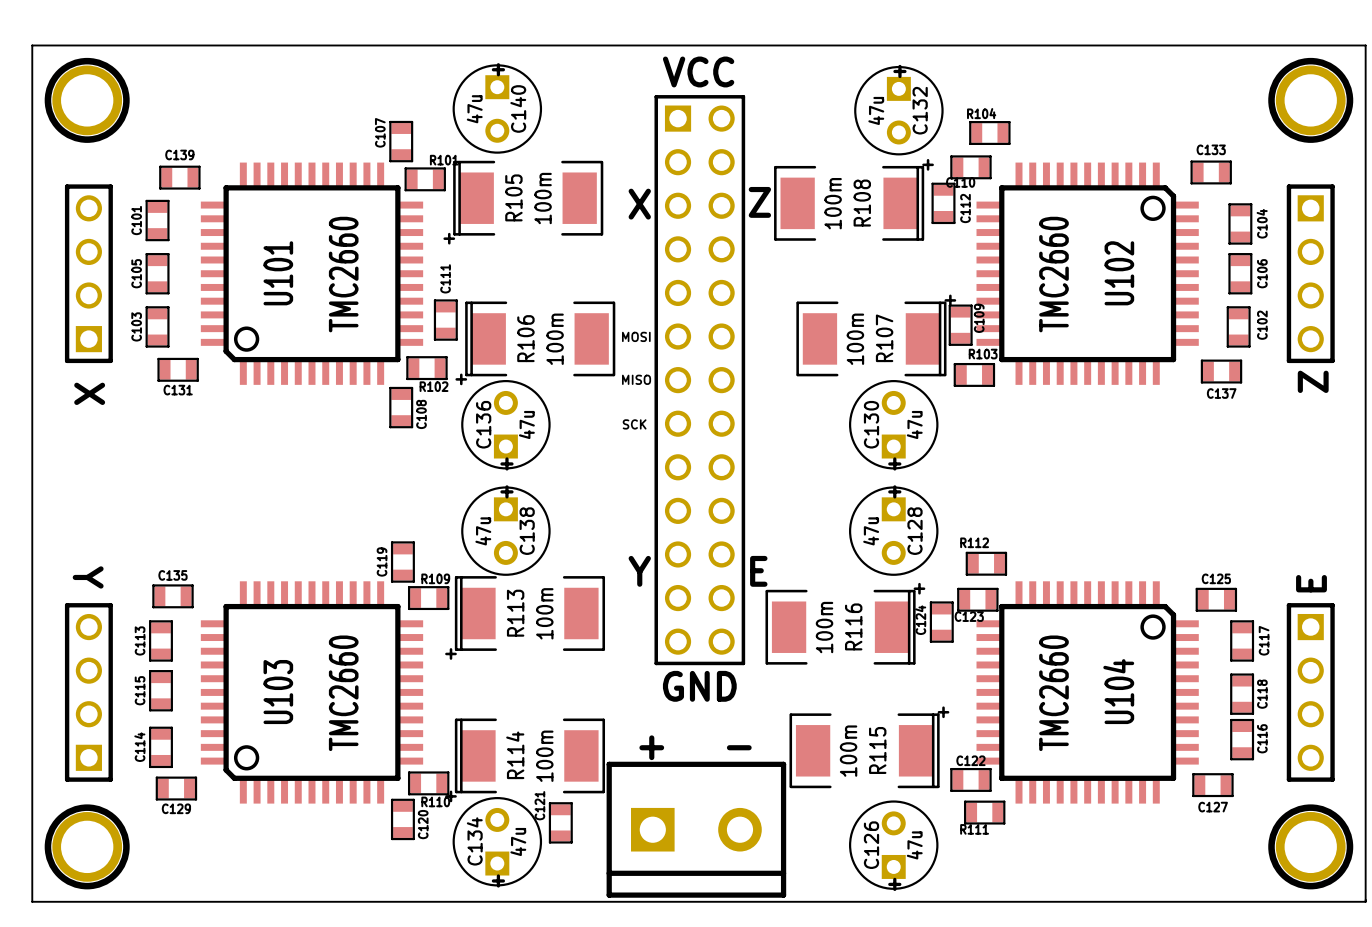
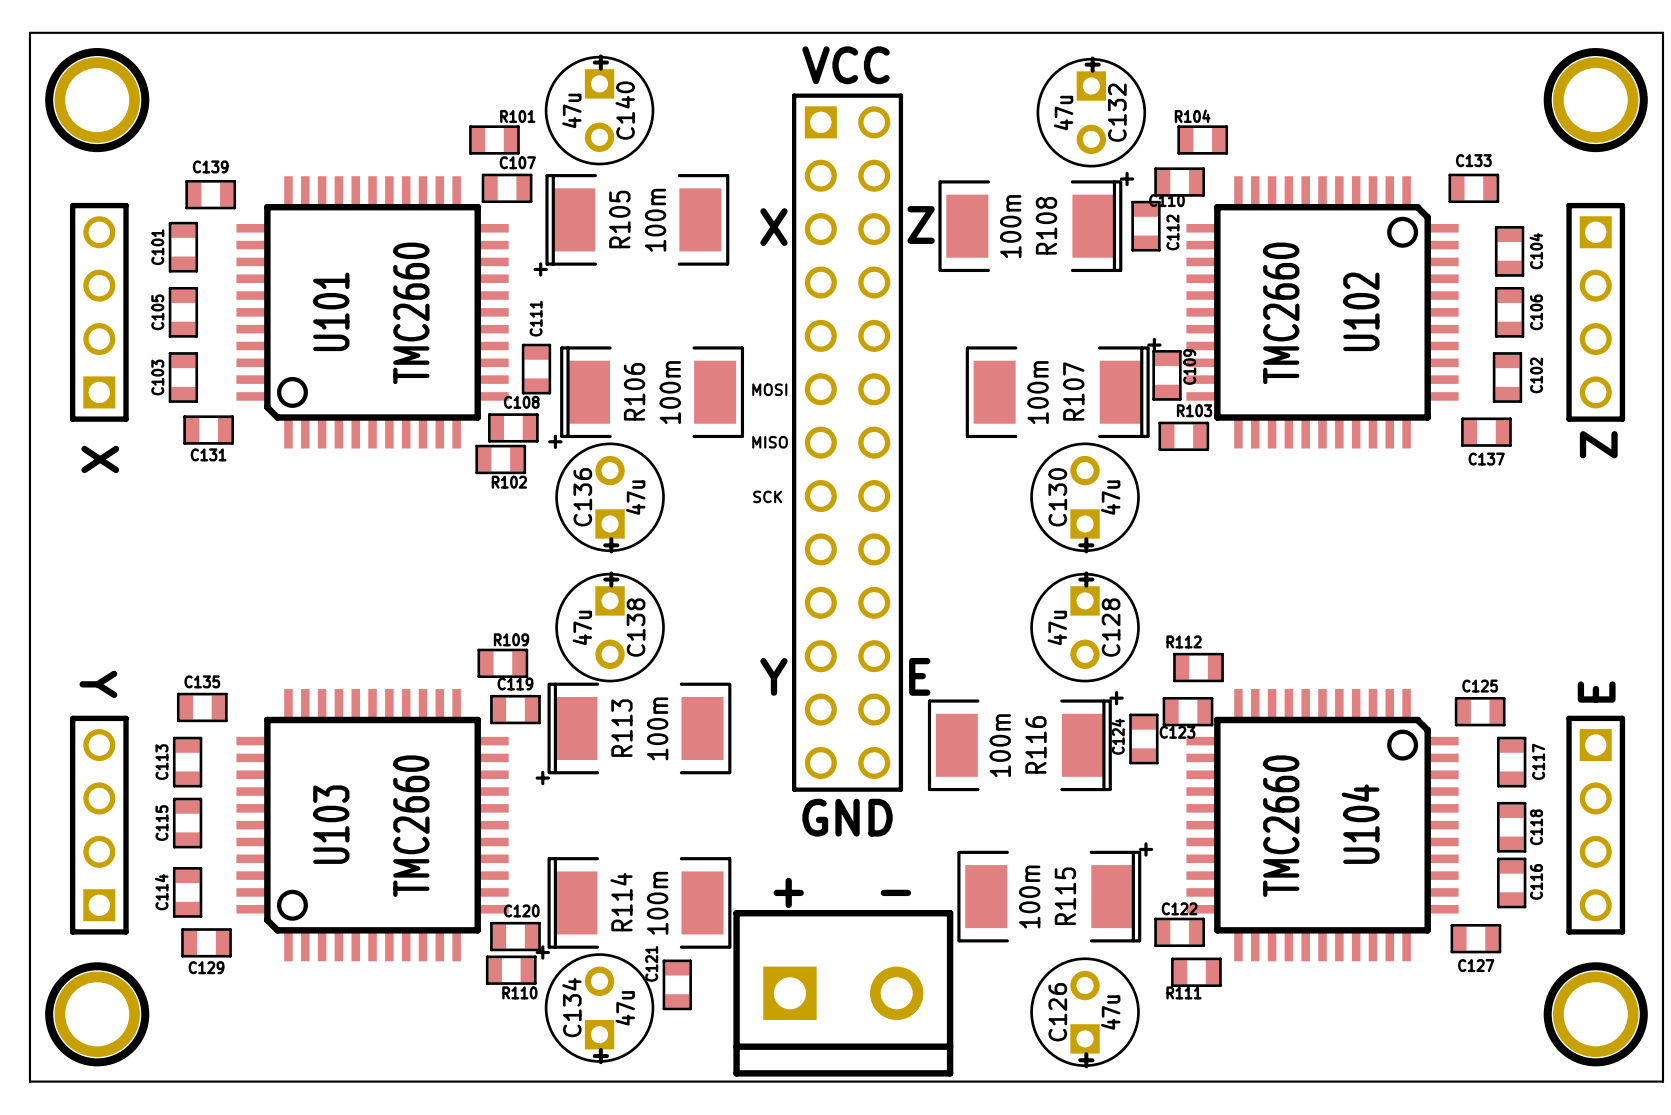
C107 rotation: 0° (401, 141) -> 90° clockwise (507, 188)
C107 position: (401, 141) -> (507, 188)
R101 position: (425, 179) -> (494, 140)
R102 name: R102 (434, 386) -> C108 (521, 402)
R102: none -> (500, 459)
C108: (401, 407) -> none
R109: none -> (502, 663)
C119: (402, 562) -> none
R109 name: R109 (435, 578) -> C119 (515, 683)
R110 name: R110 (435, 801) -> C120 (521, 910)
R110: none -> (511, 970)
C120: (402, 819) -> none

